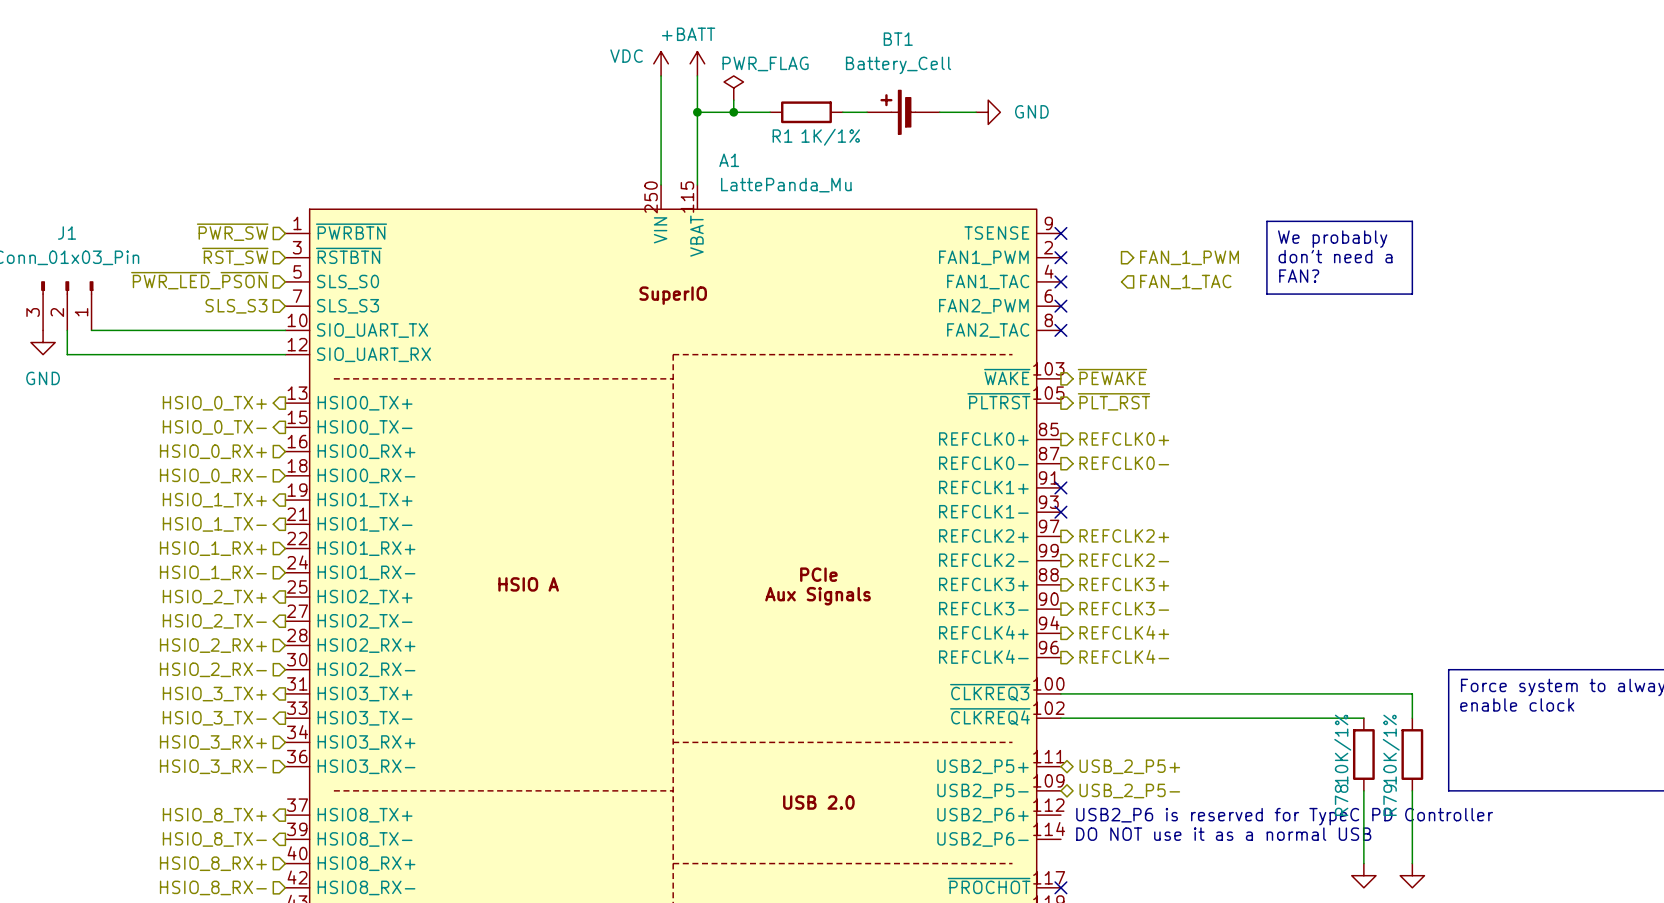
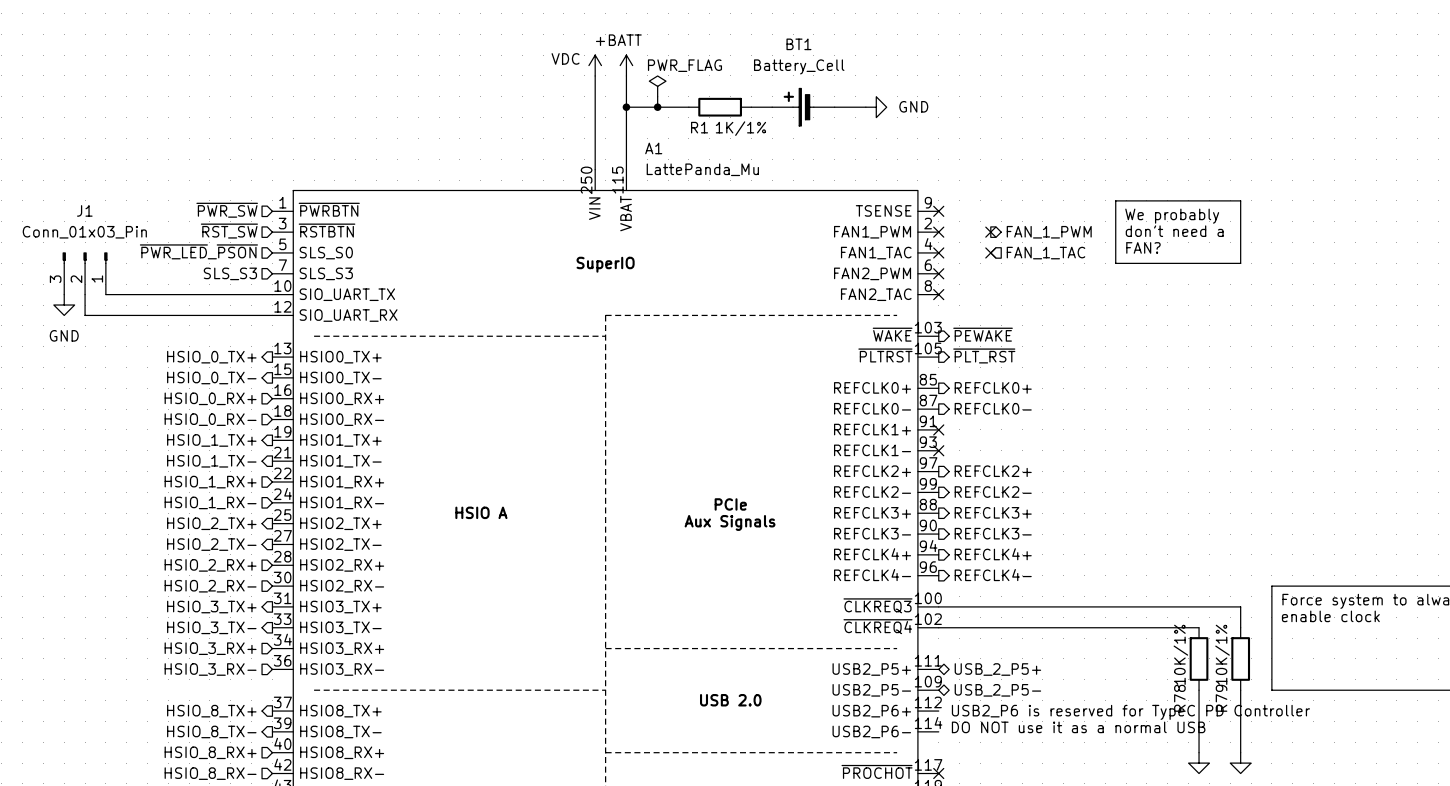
no-connect mark: none -> (990, 232)
no-connect mark: none -> (990, 252)

